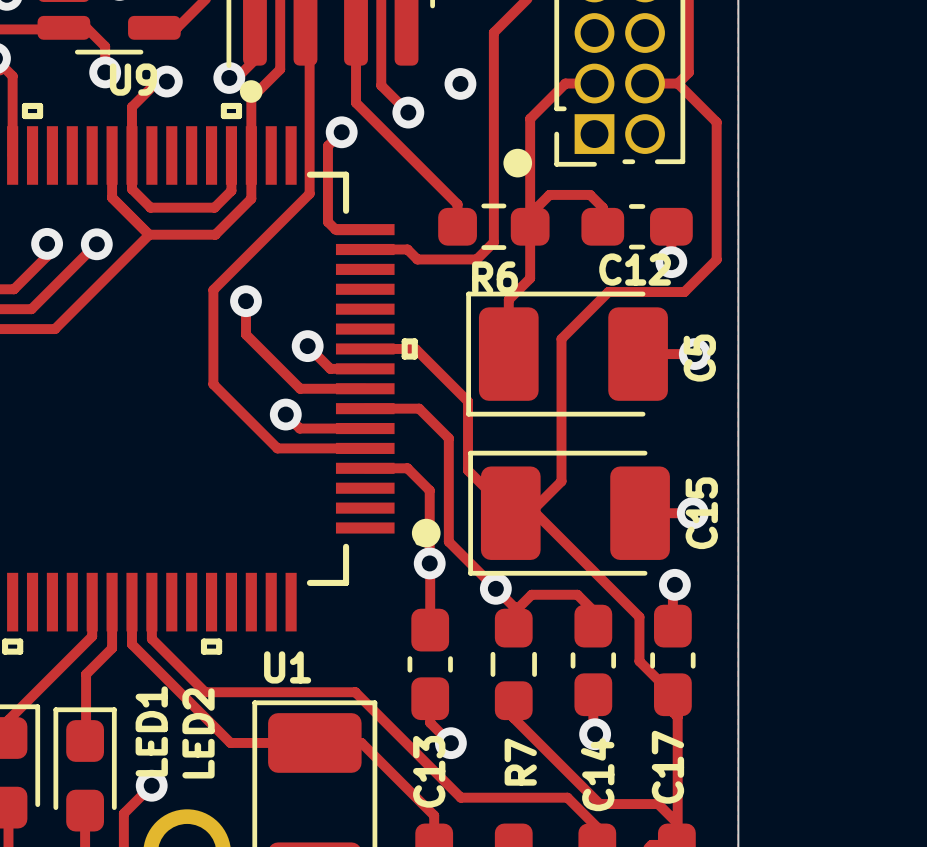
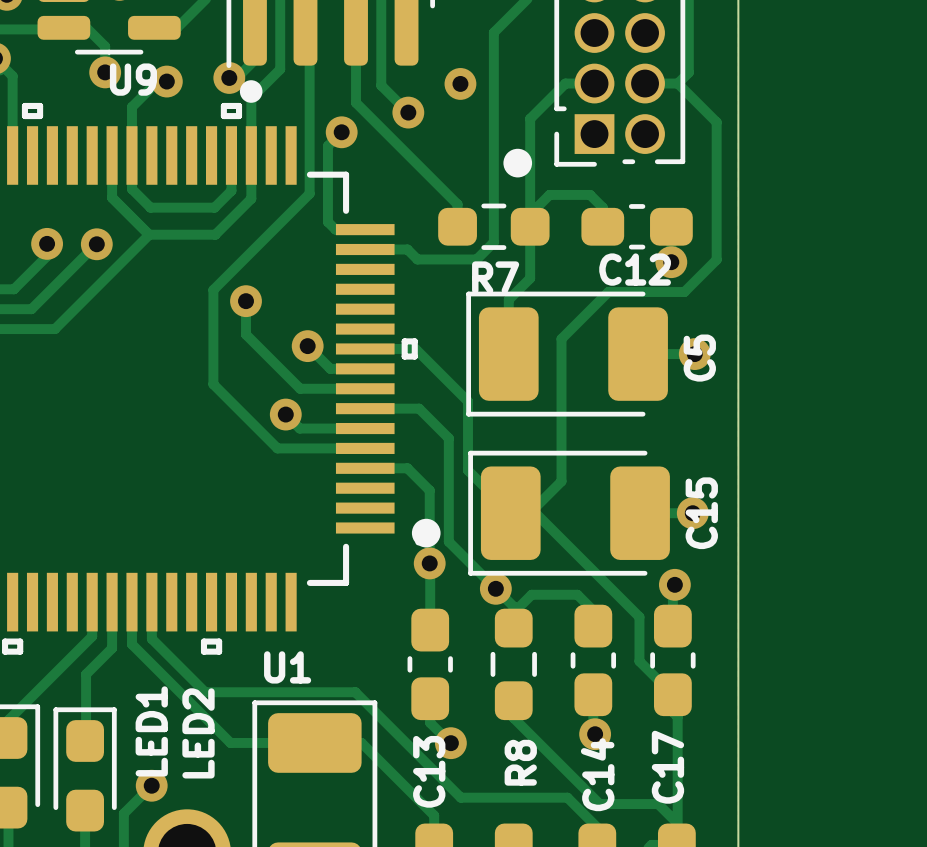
R6 name: R6 (494, 277) -> R7 (495, 277)
R7 name: R7 (520, 762) -> R8 (520, 762)

